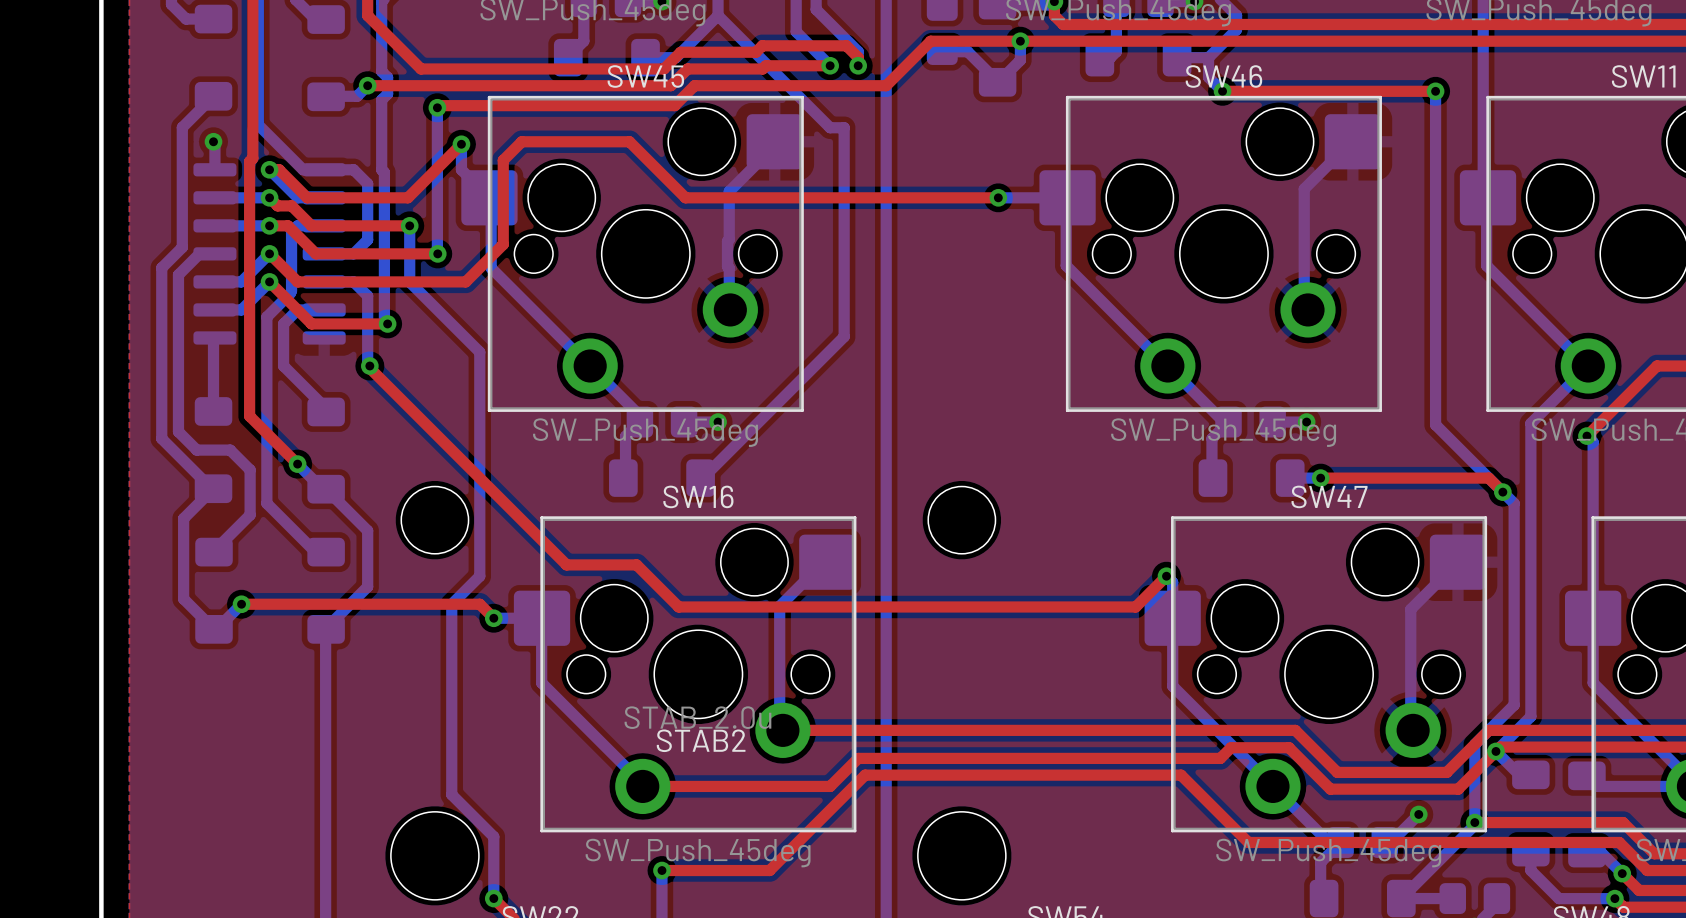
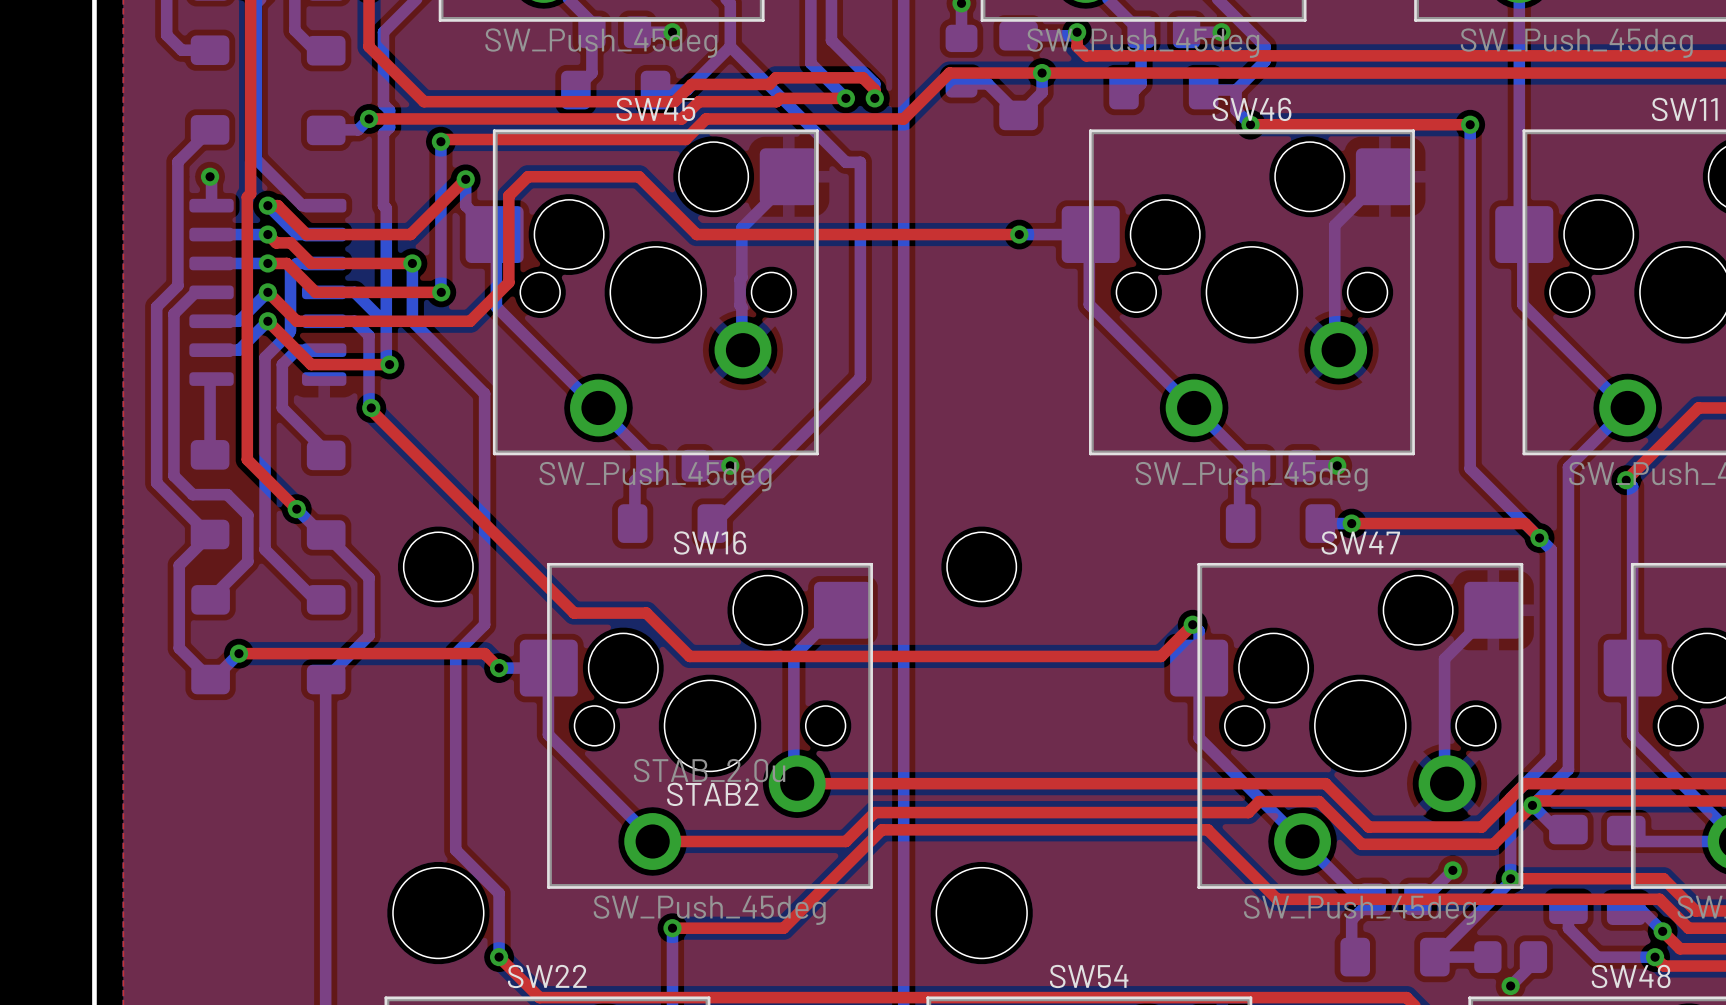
bottom track: (324, 169) (353, 169) (367, 183) (367, 239) (353, 253) -> (386, 323) (354, 292)

